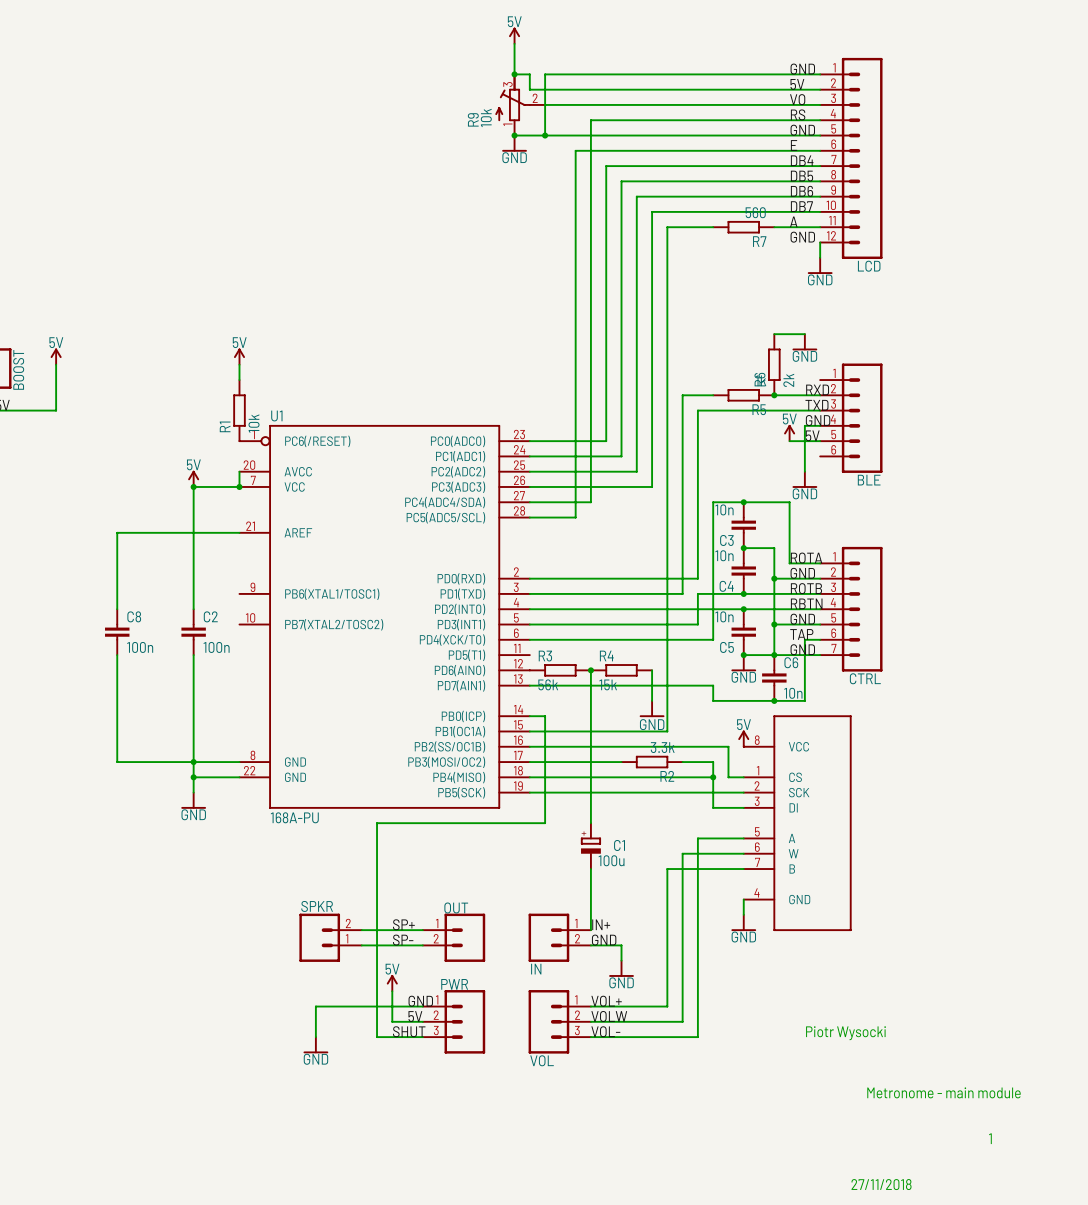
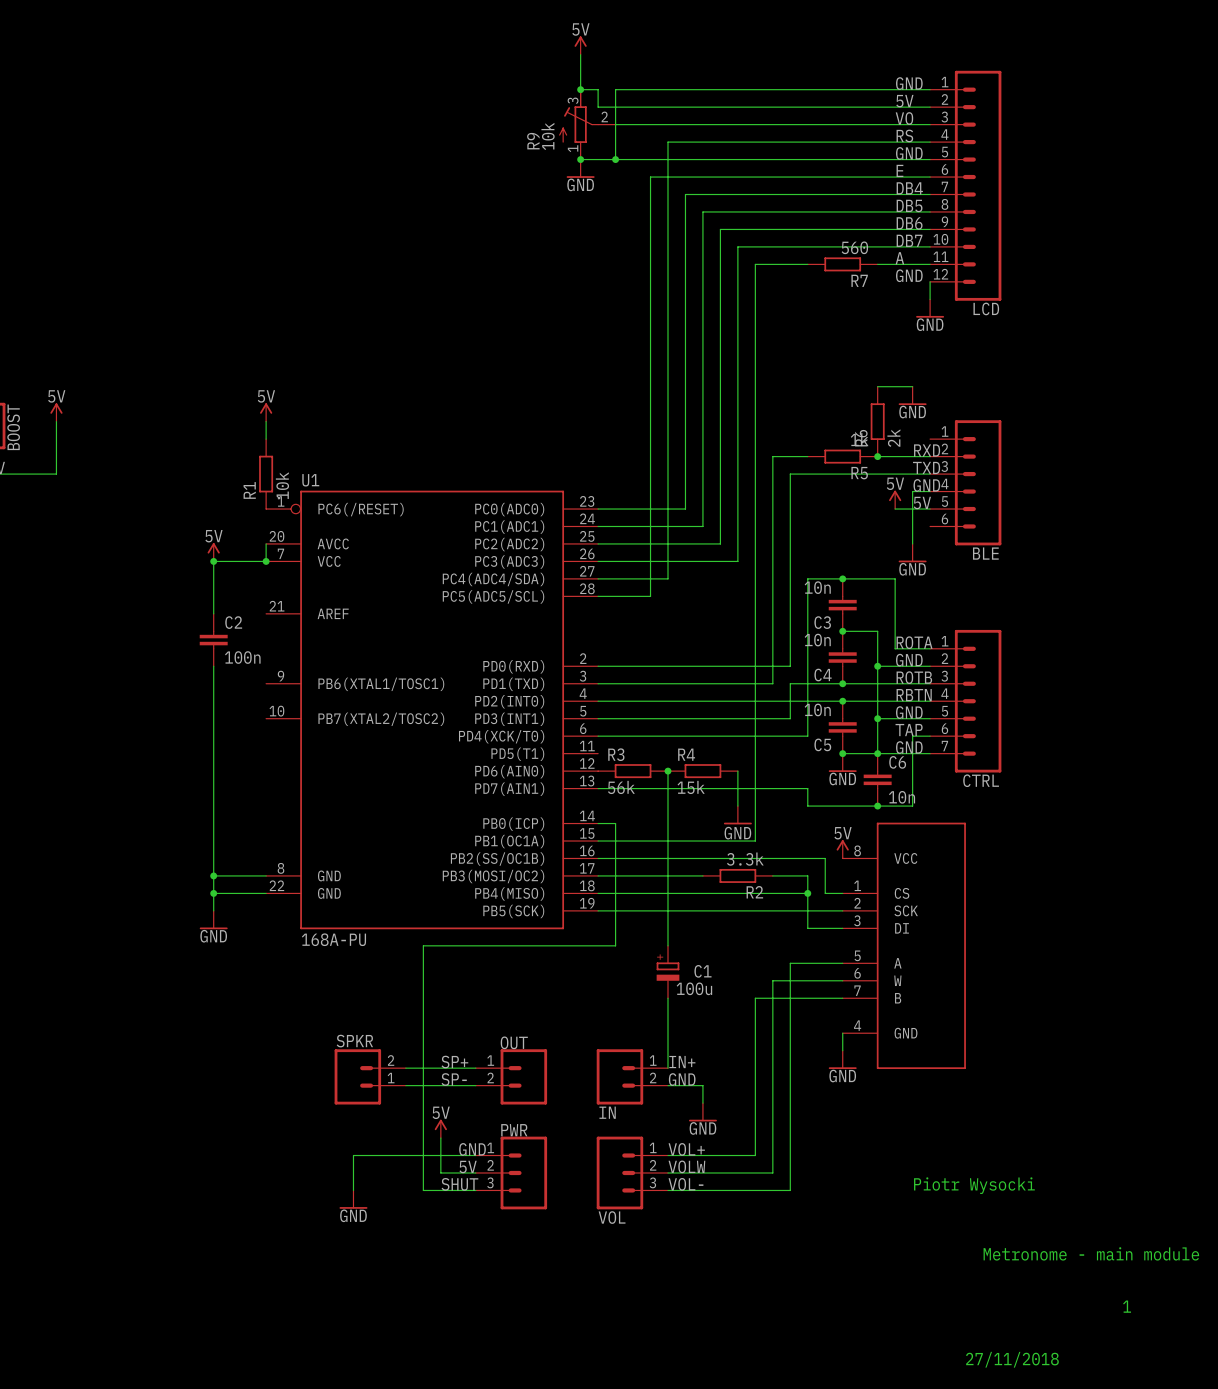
wire: (239, 532) (117, 532) (117, 609) -> none
C8: 100n (117, 632) -> none
C2 position: (193, 632) -> (213, 640)
wire: (117, 655) (117, 762) (193, 762) -> none

